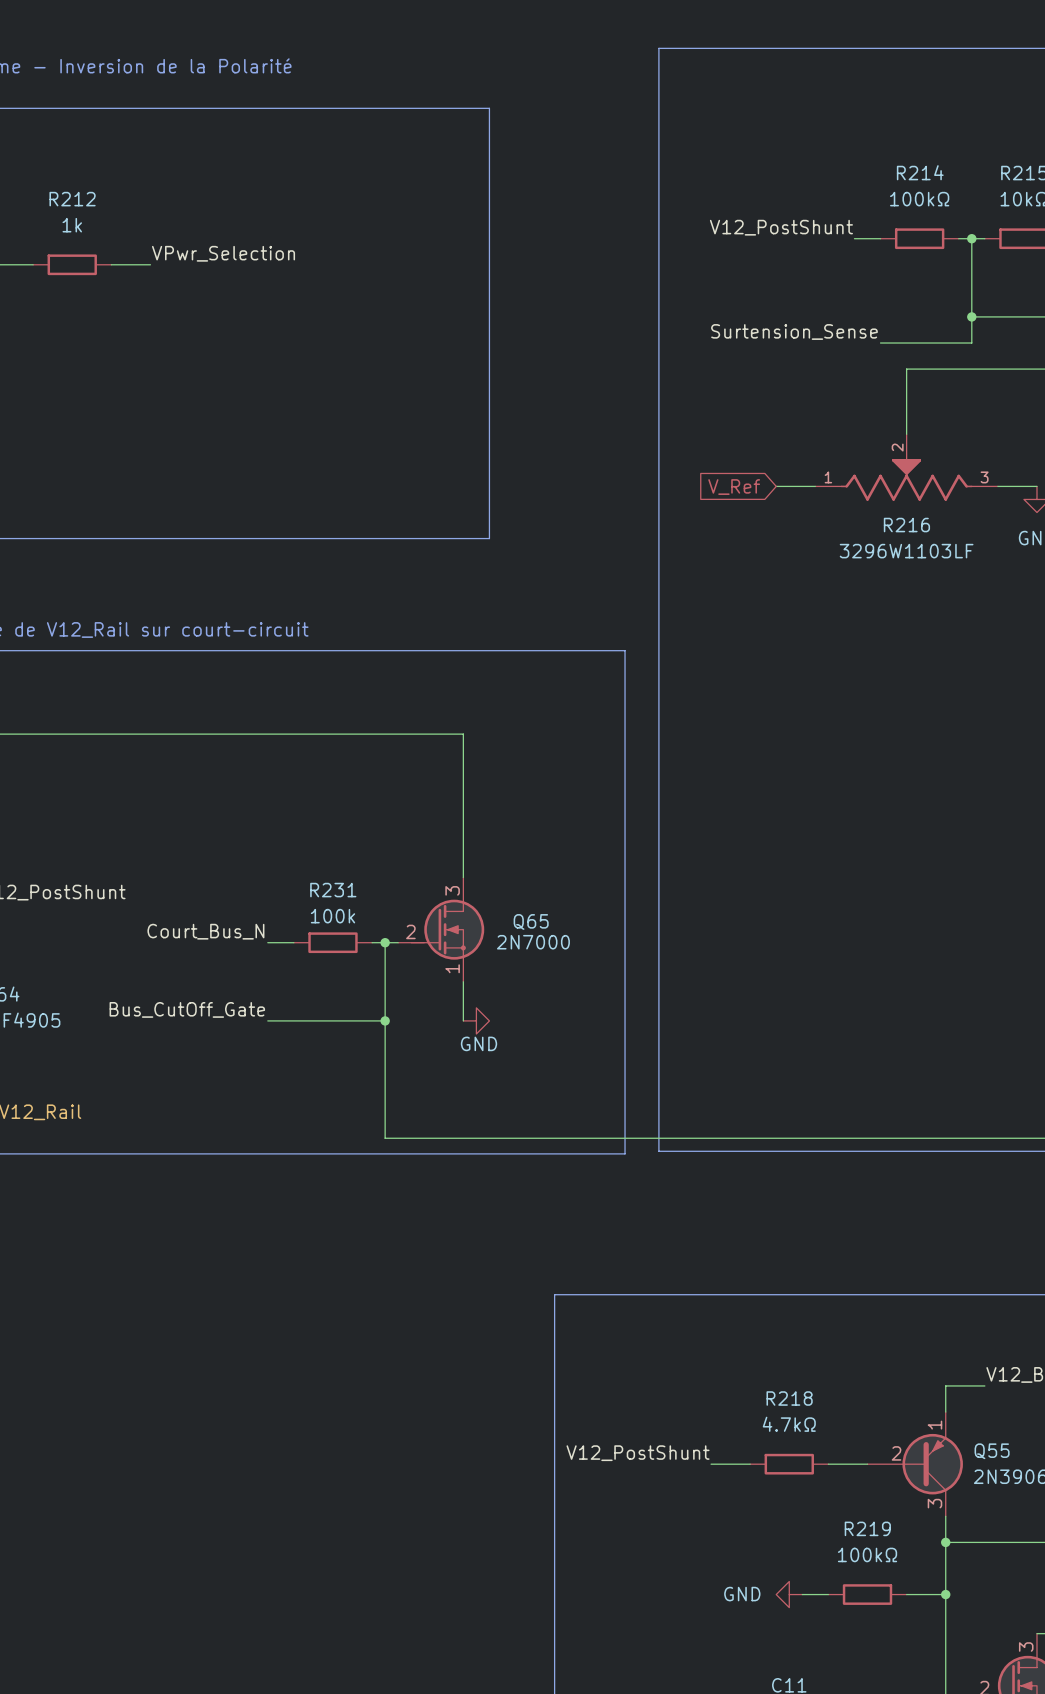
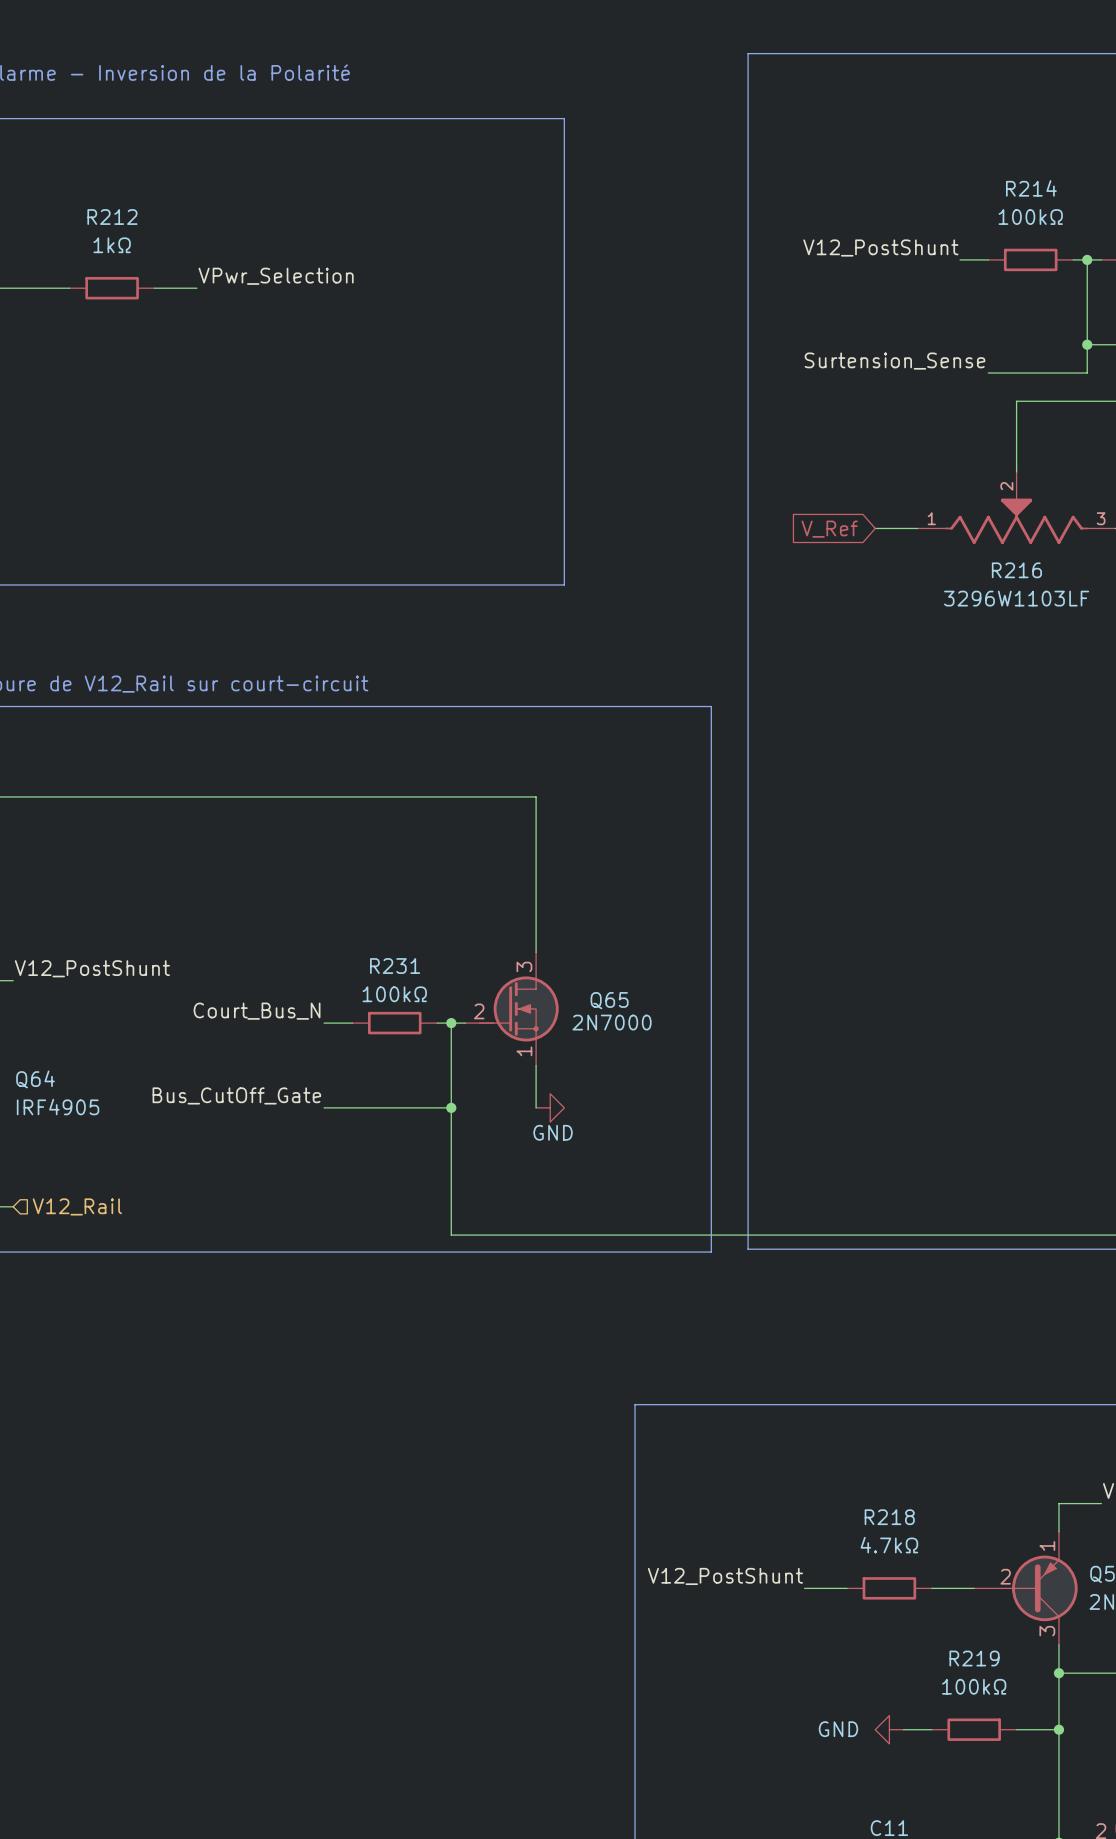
R212 value: 1k (72, 225) -> 1kΩ (112, 245)
R231 value: 100k (332, 916) -> 100kΩ (394, 994)

